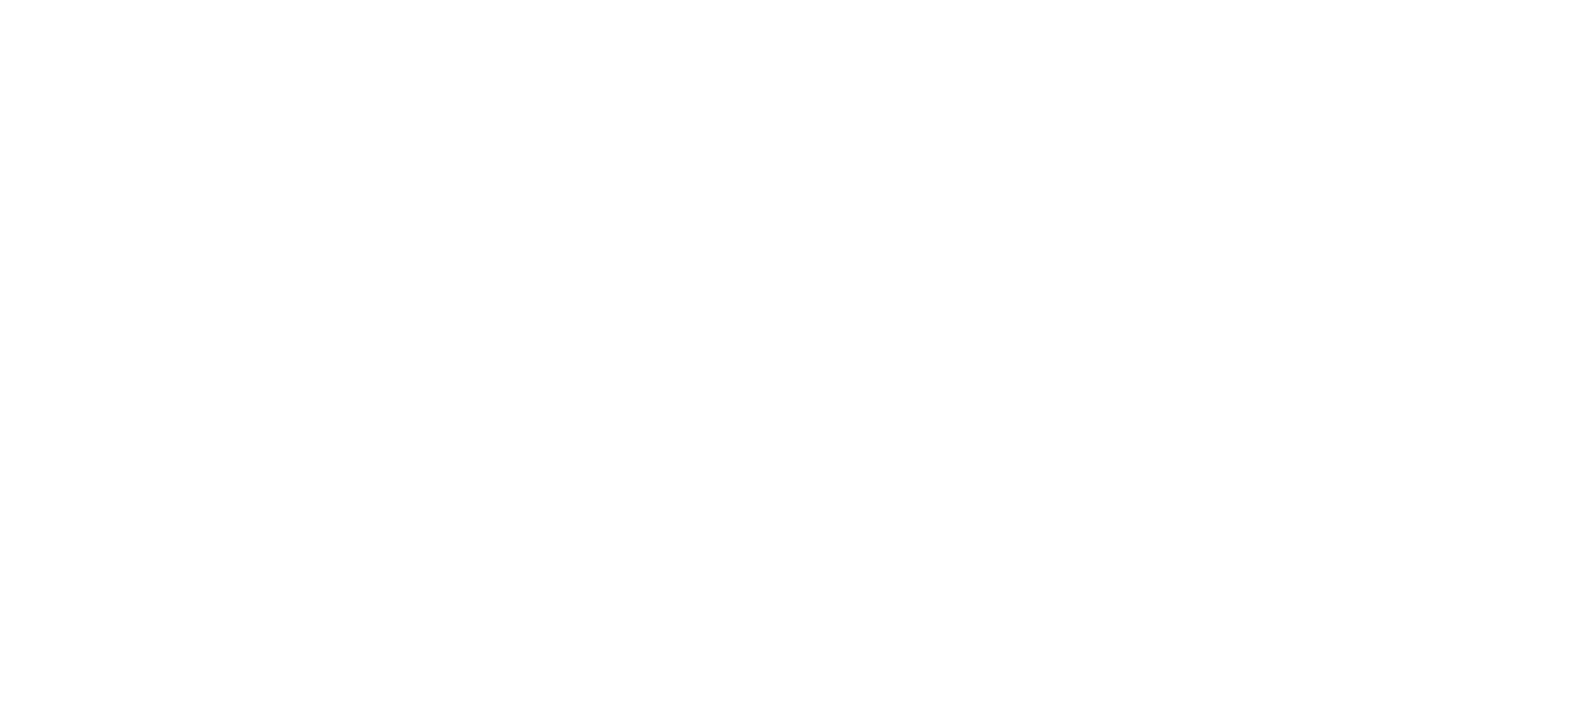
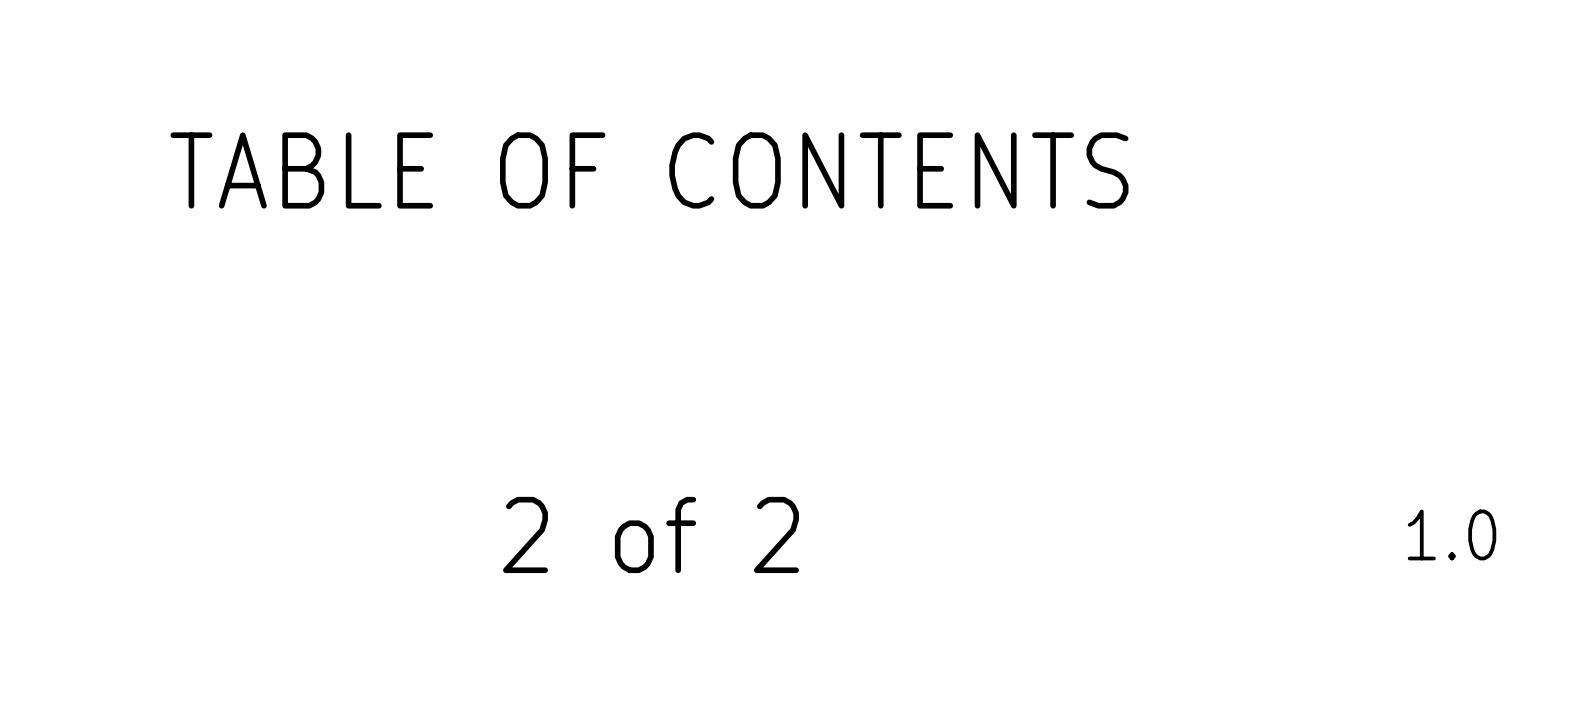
text: none -> TABLE OF CONTENTS (649, 170)
text: none -> 2 of 2 (650, 534)
text: none -> 1.0 (1452, 534)

